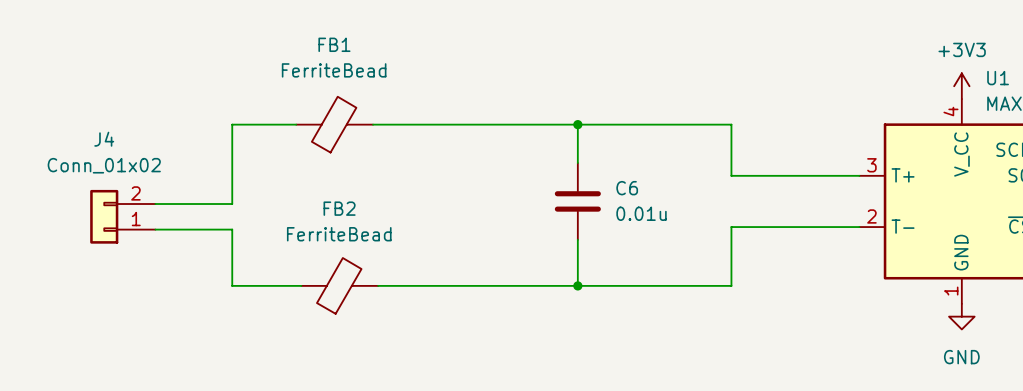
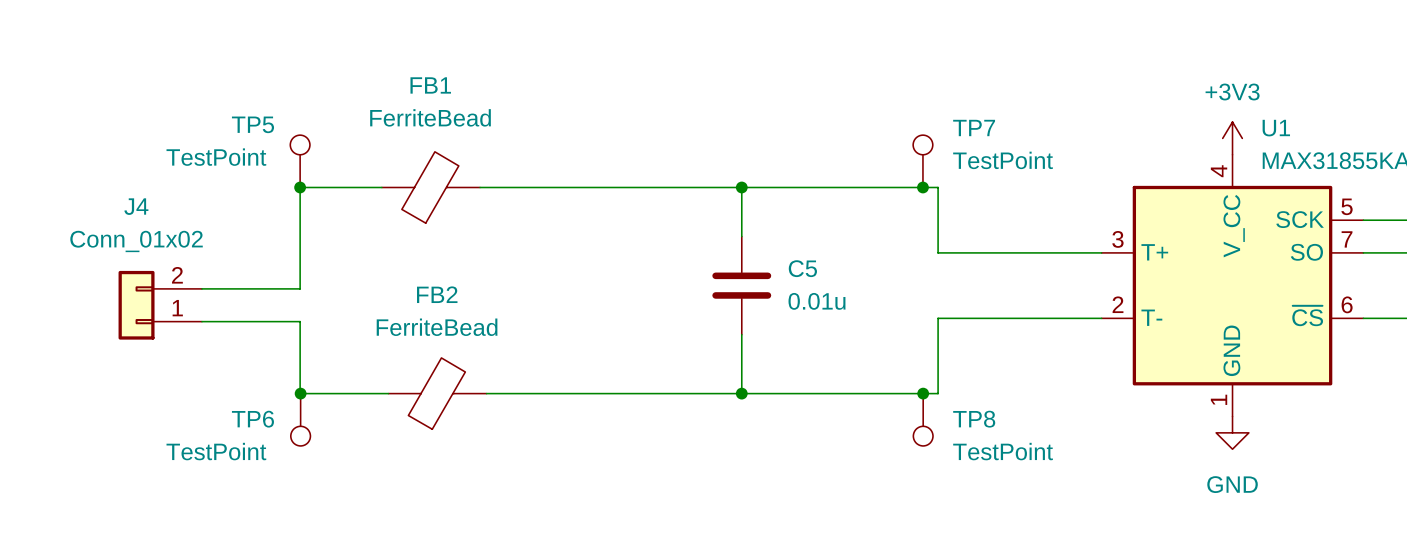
TP5: none -> TestPoint (300, 161)
TP7: none -> TestPoint (922, 161)
junction: none -> (300, 187)
junction: none -> (922, 187)
C6 name: C6 (627, 188) -> C5 (802, 268)
junction: none -> (300, 393)
junction: none -> (923, 393)
TP6: none -> TestPoint (300, 419)
TP8: none -> TestPoint (923, 419)

